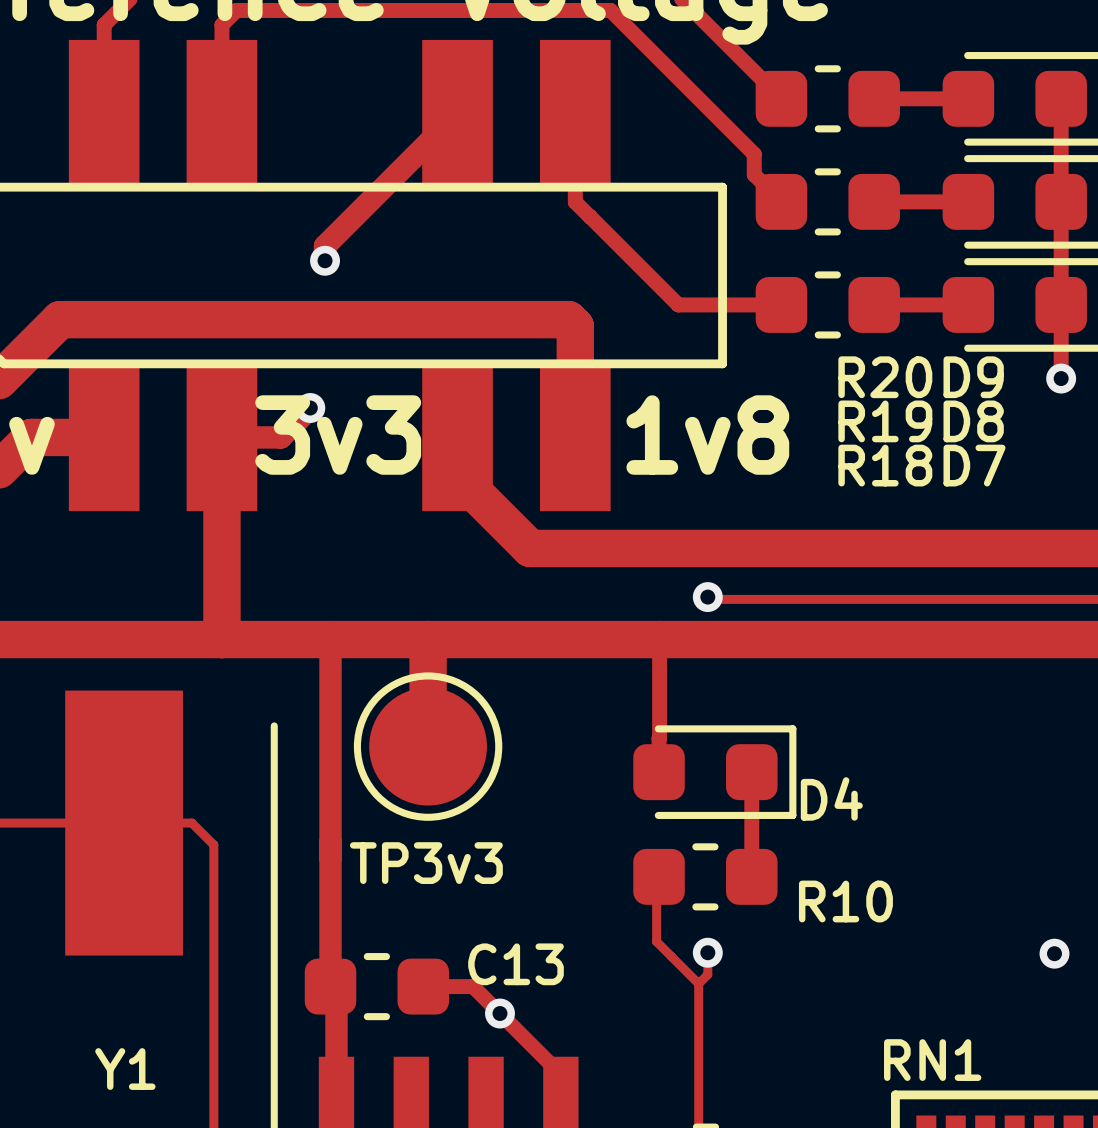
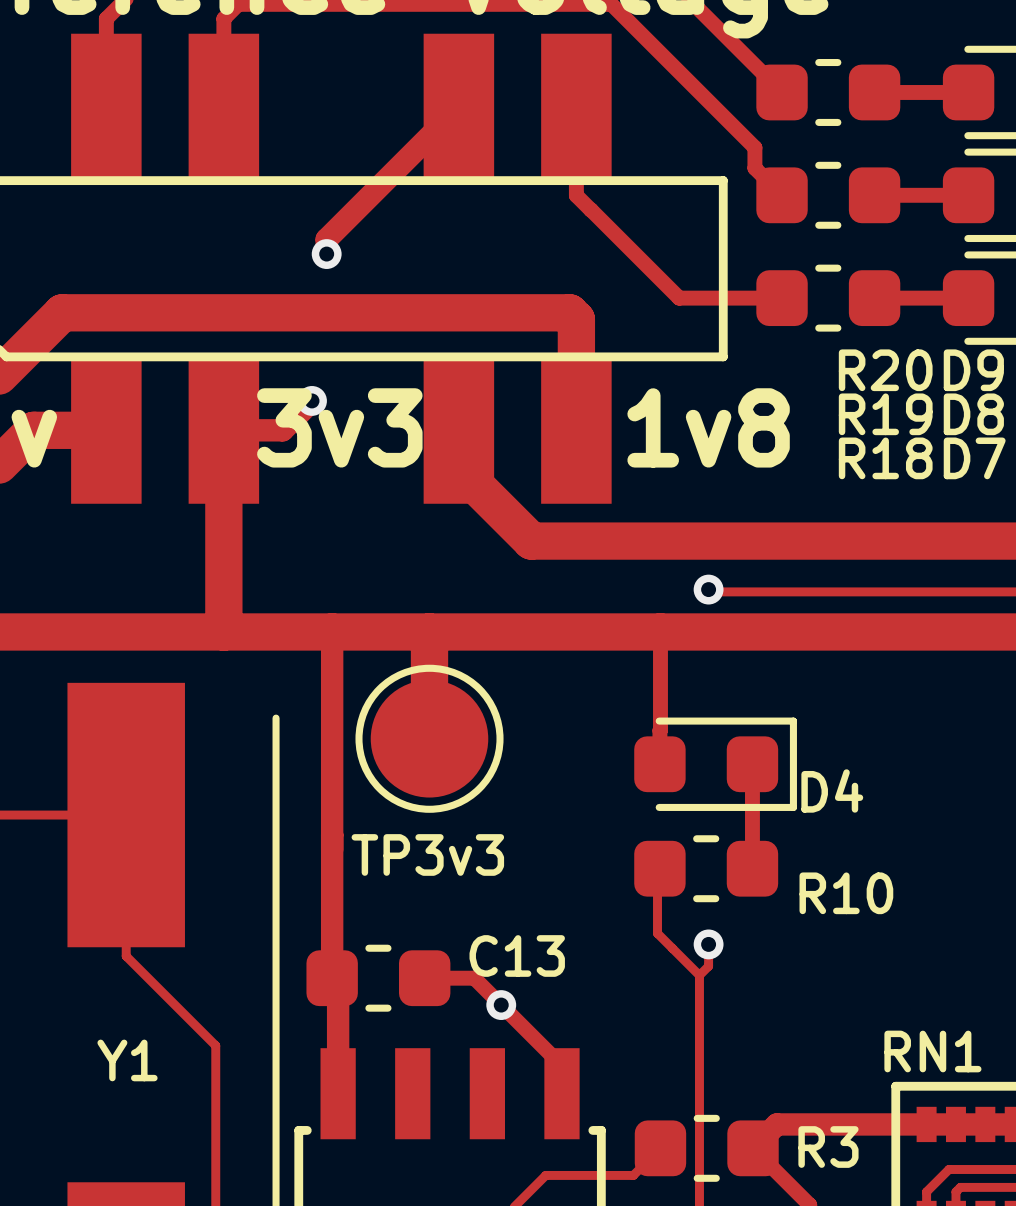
track: (124, 823) (191, 823) (213, 844) (213, 1054) -> (126, 815) (126, 956) (215, 1045)

